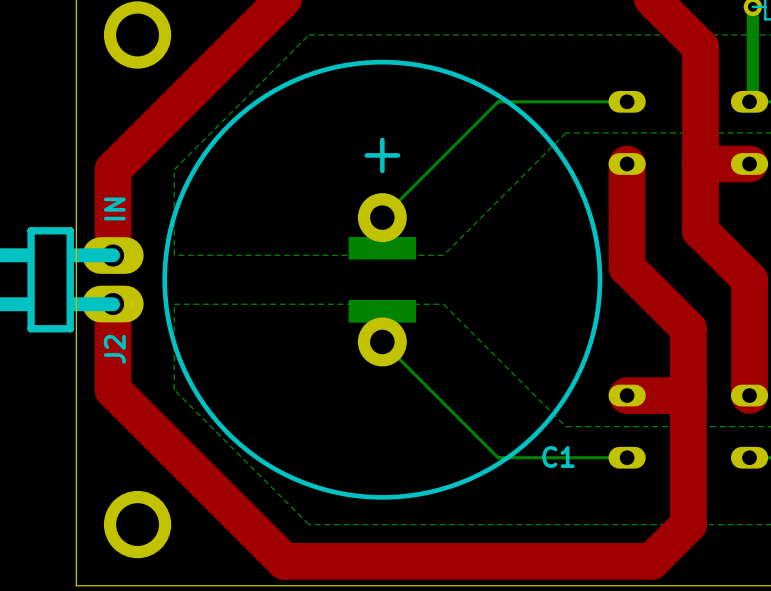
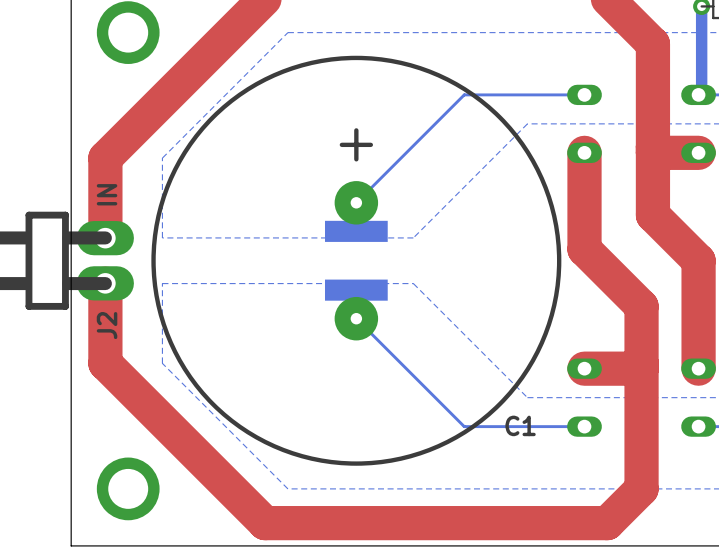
C1 footprint: [162, 59, 603, 500] -> [151, 55, 562, 466]

